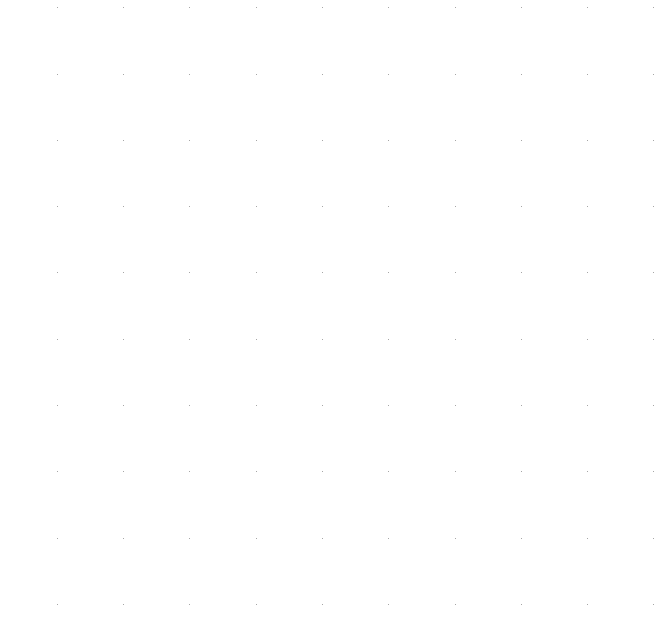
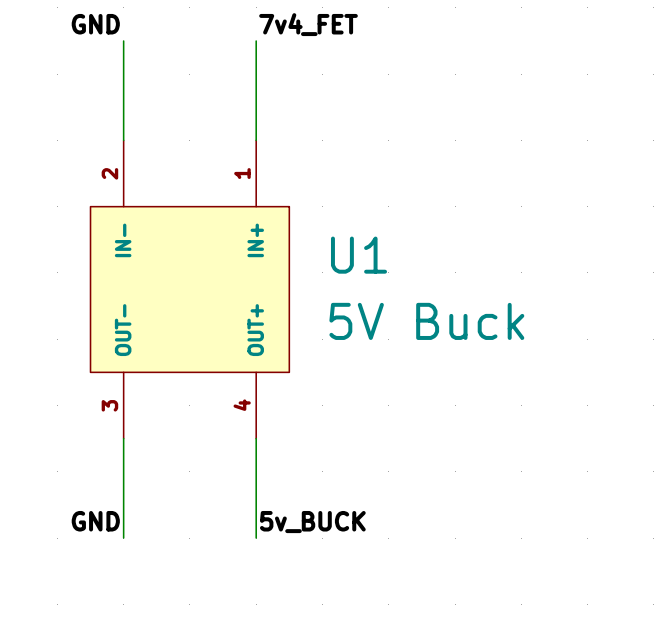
label: none -> GND (95, 24)
label: none -> 7v4_FET (308, 24)
wire: none -> (123, 40) (123, 140)
wire: none -> (256, 40) (256, 140)
U1: none -> 5V Buck (189, 289)
wire: none -> (123, 438) (123, 538)
wire: none -> (256, 438) (256, 538)
label: none -> GND (95, 521)
label: none -> 5v_BUCK (312, 522)

